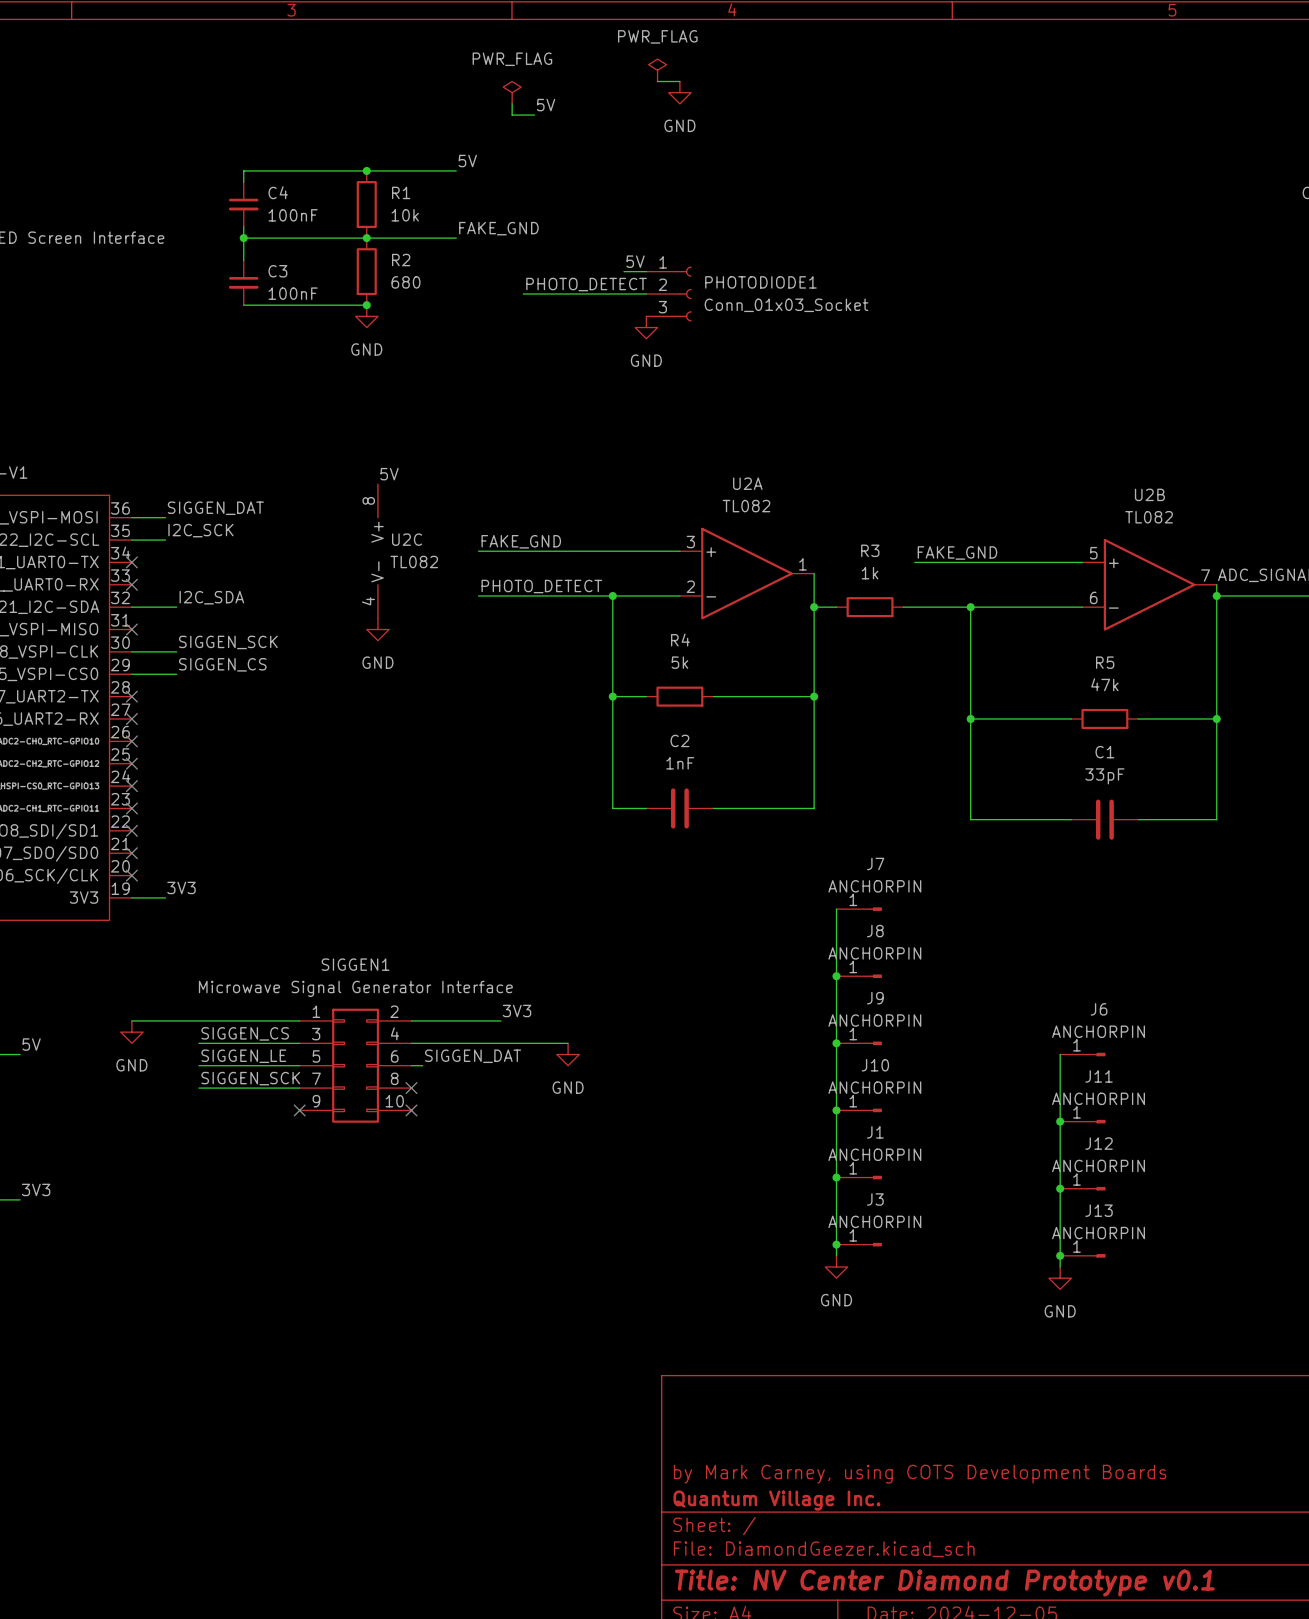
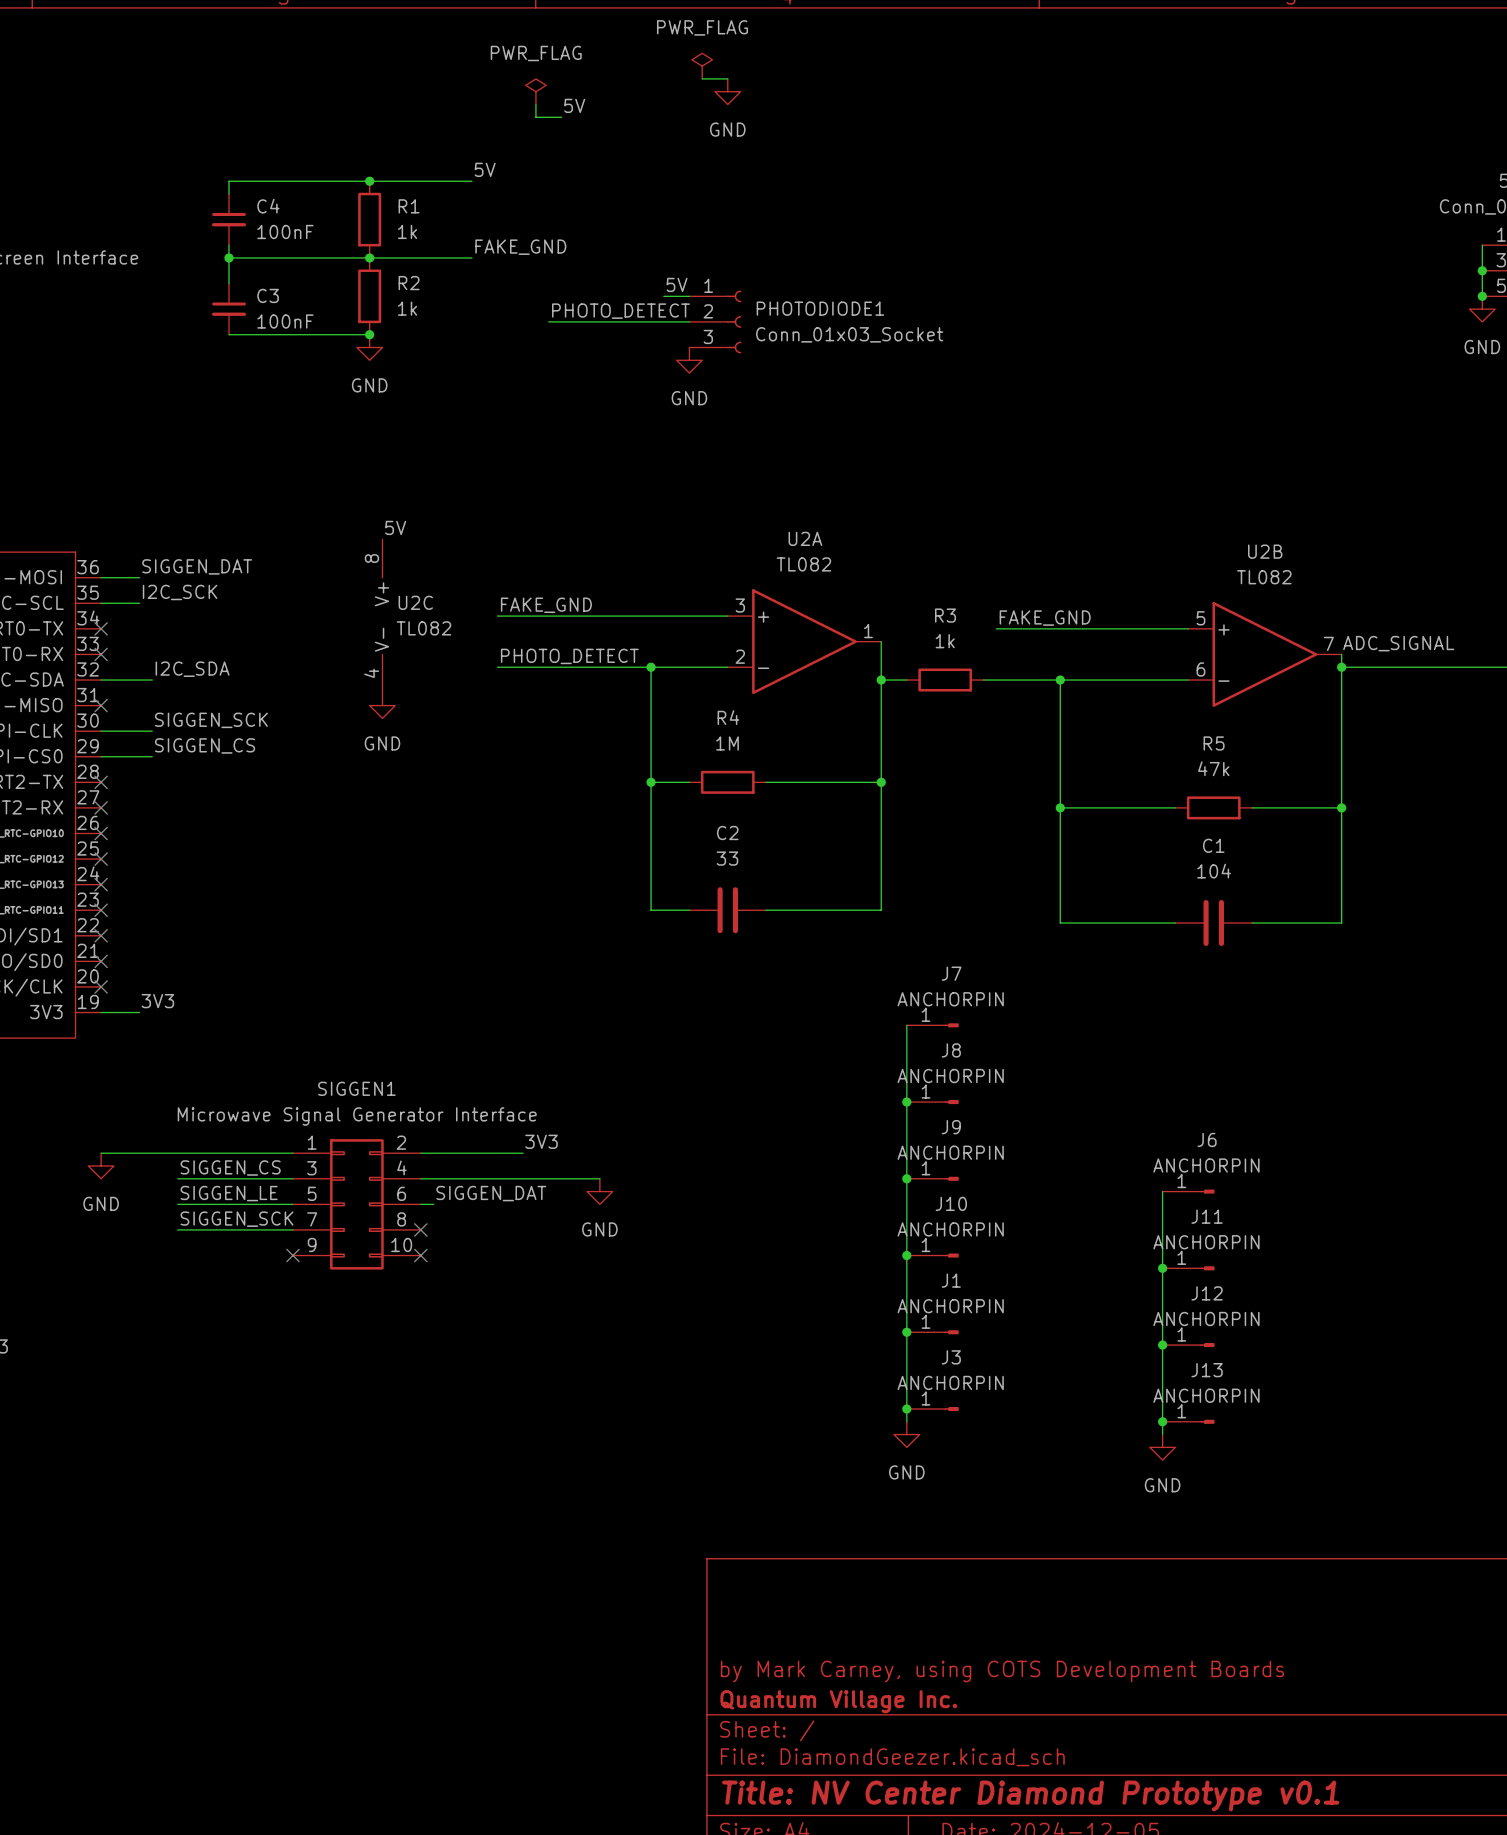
R1 value: 10k (405, 215) -> 1k (407, 231)
R2 value: 680 (405, 282) -> 1k (407, 308)
R4 value: 5k (679, 662) -> 1M (727, 743)
C2 value: 1nF (680, 763) -> 33 (727, 858)
C1 value: 33pF (1104, 776) -> 104 (1214, 871)

